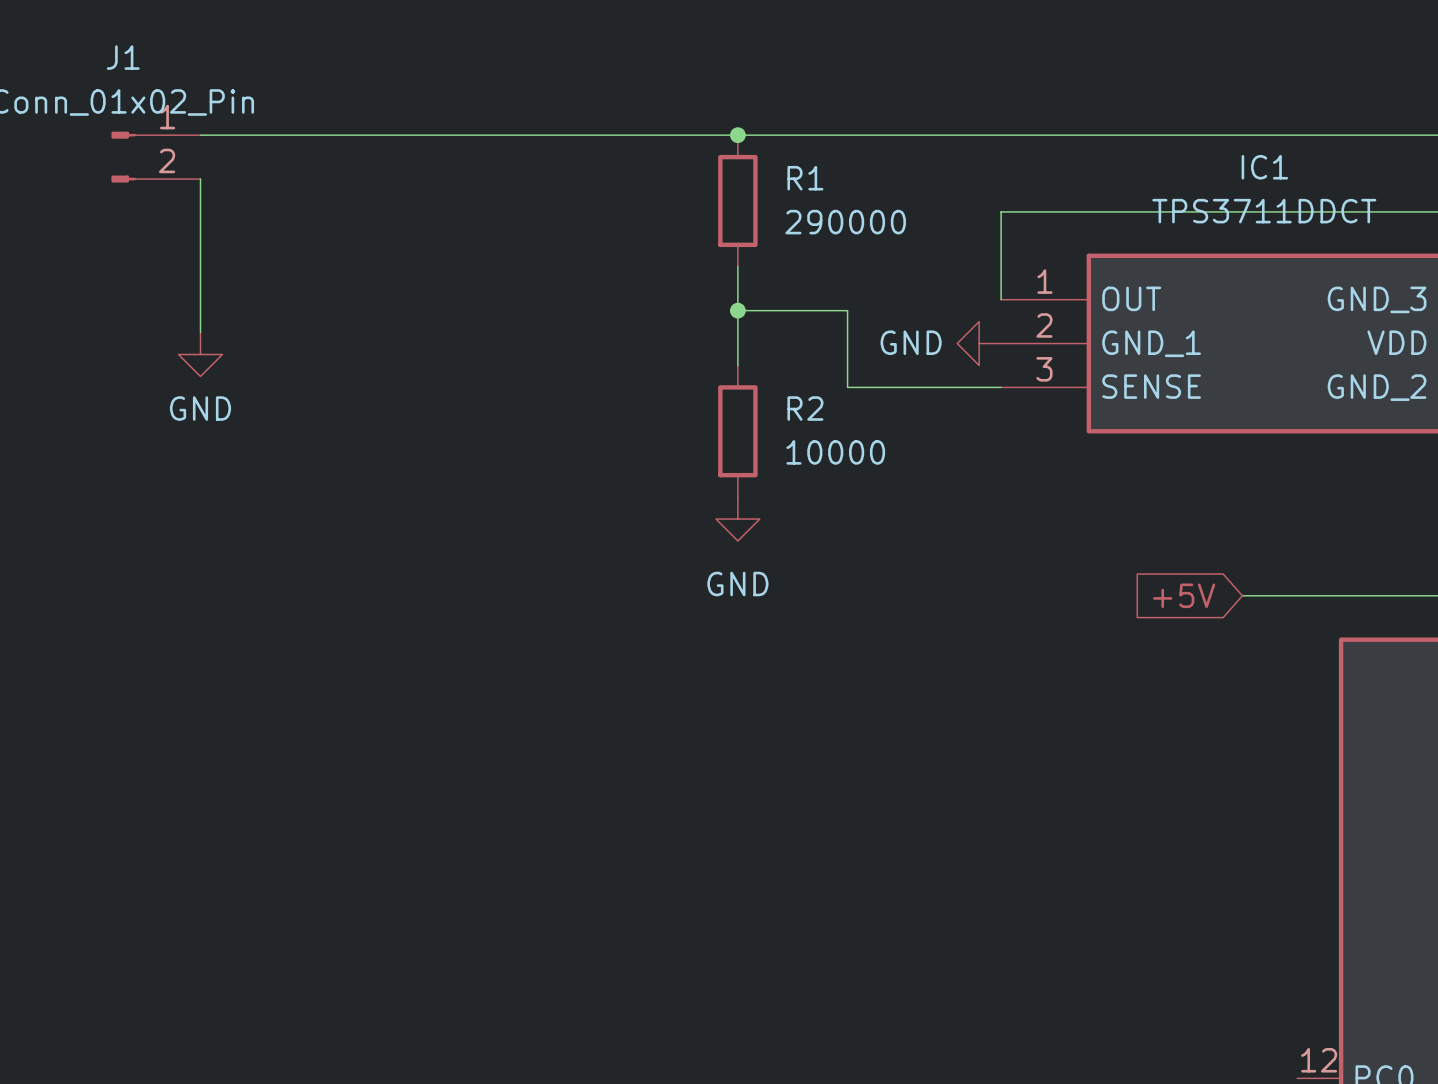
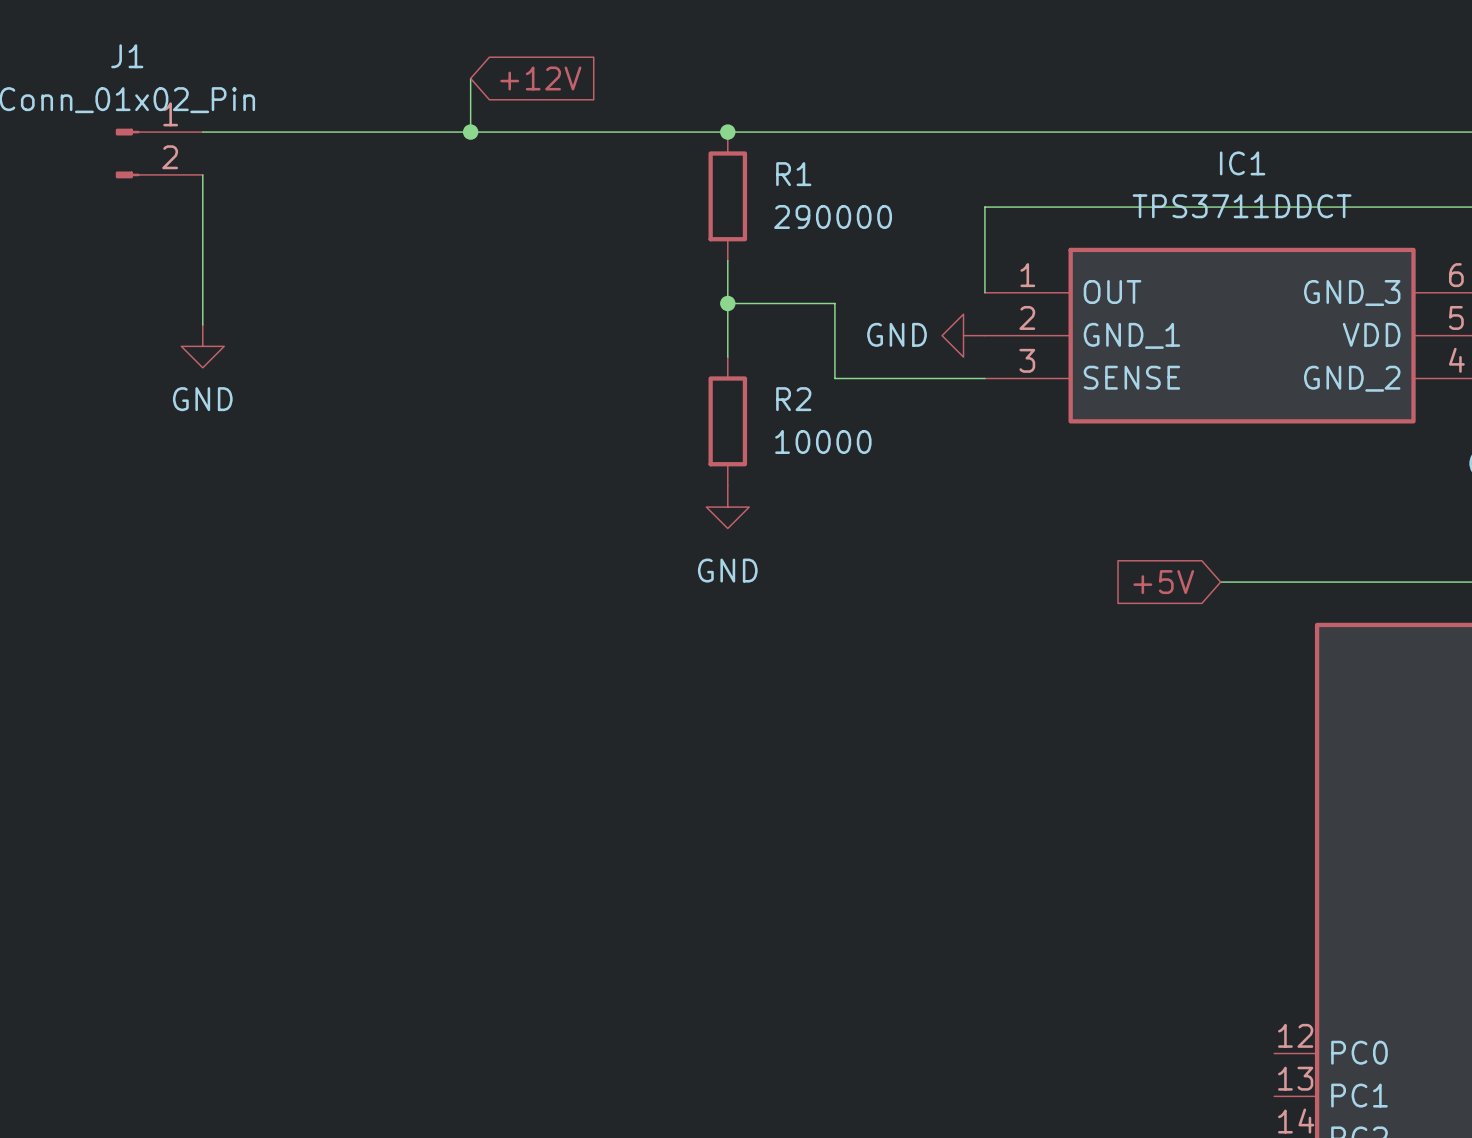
wire: none -> (470, 78) (470, 132)
global label: none -> +12V (540, 78)
junction: none -> (470, 132)

